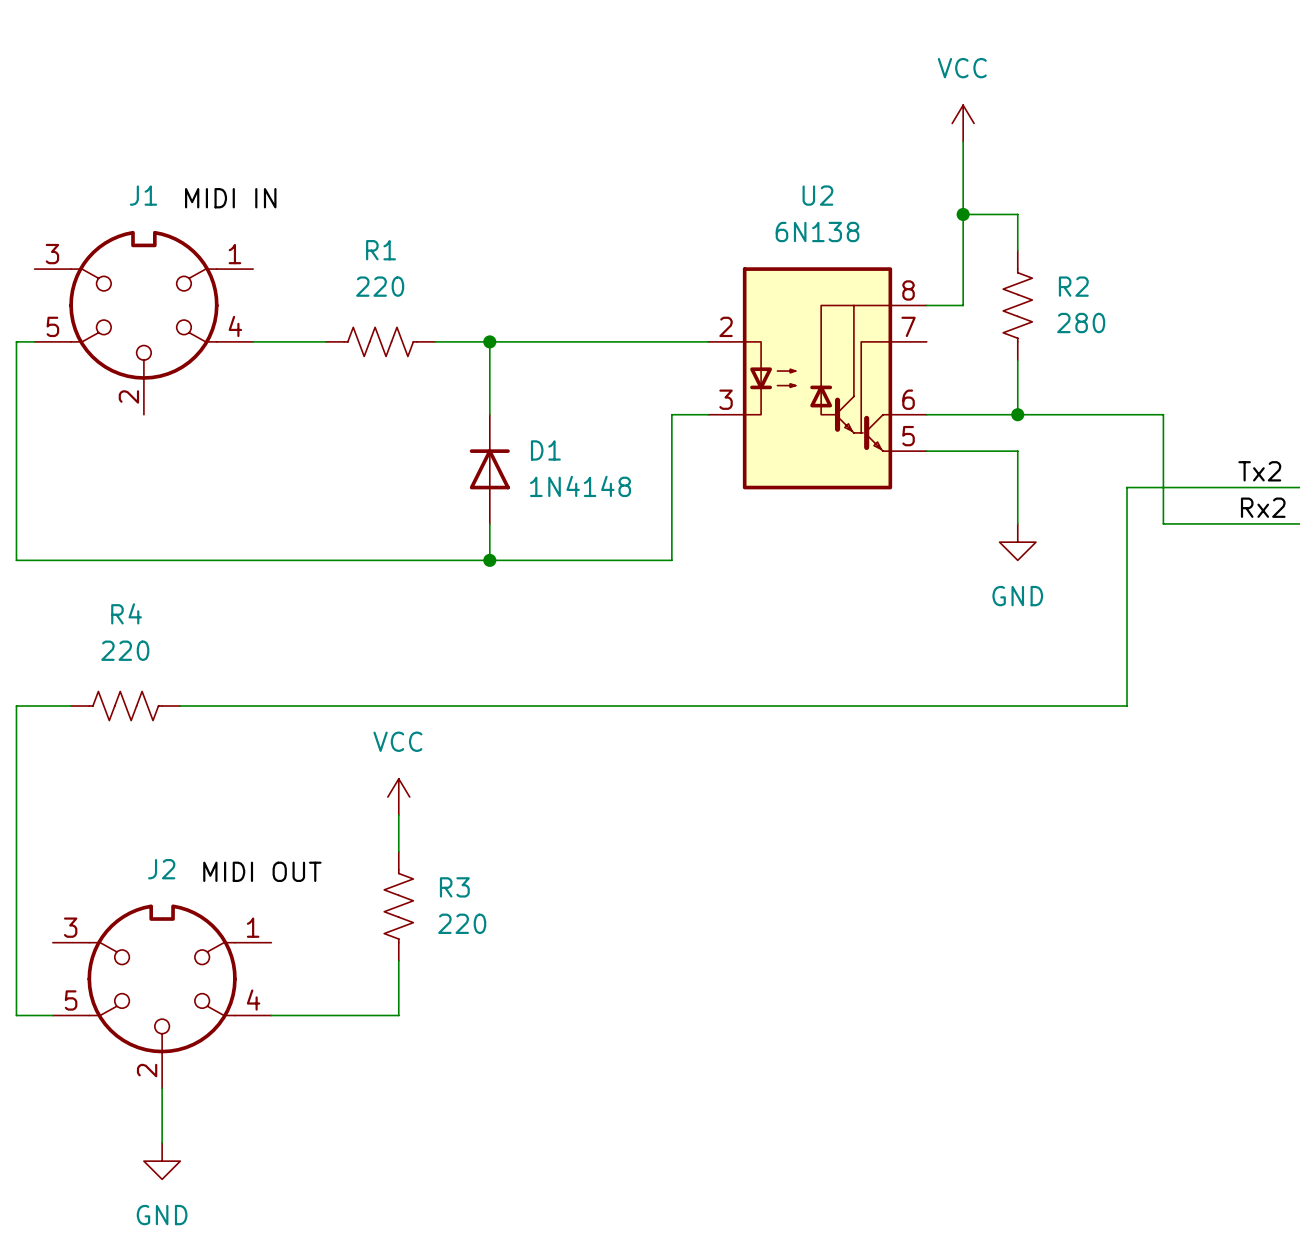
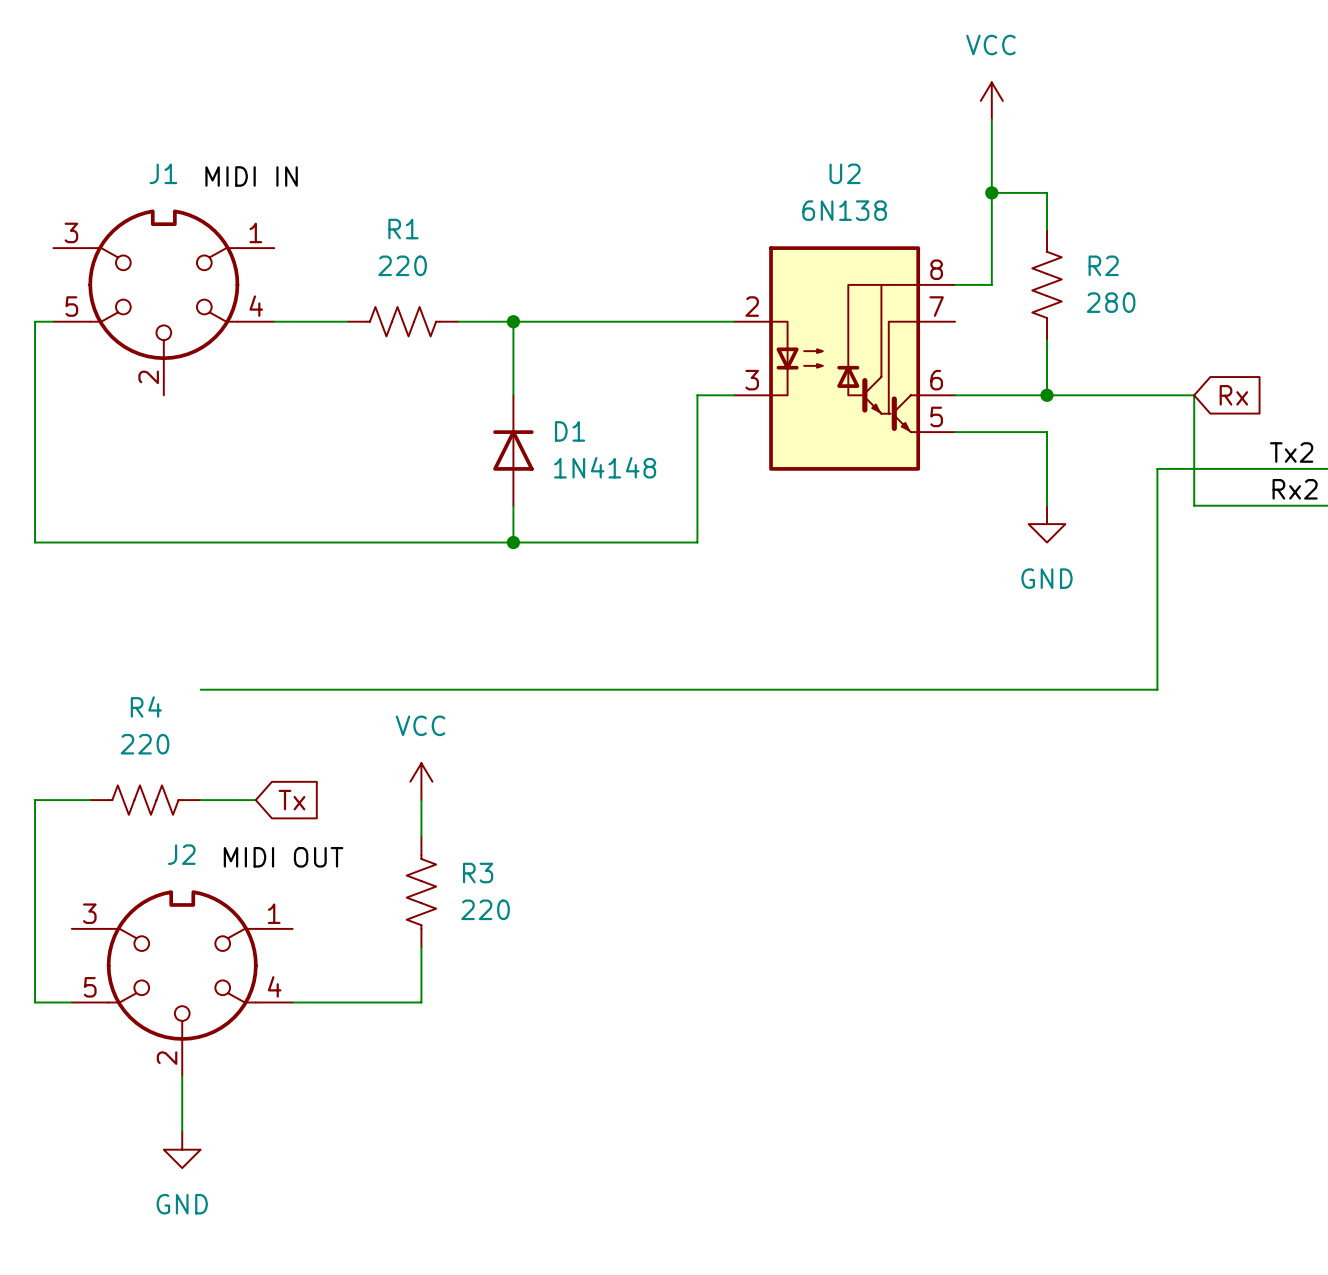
global label: none -> Rx (1233, 395)
wire: (71, 706) (16, 706) (16, 815) -> (90, 800) (35, 800)
R4 position: (125, 706) -> (145, 800)
wire: none -> (200, 800) (255, 800)
global label: none -> Tx (292, 800)

